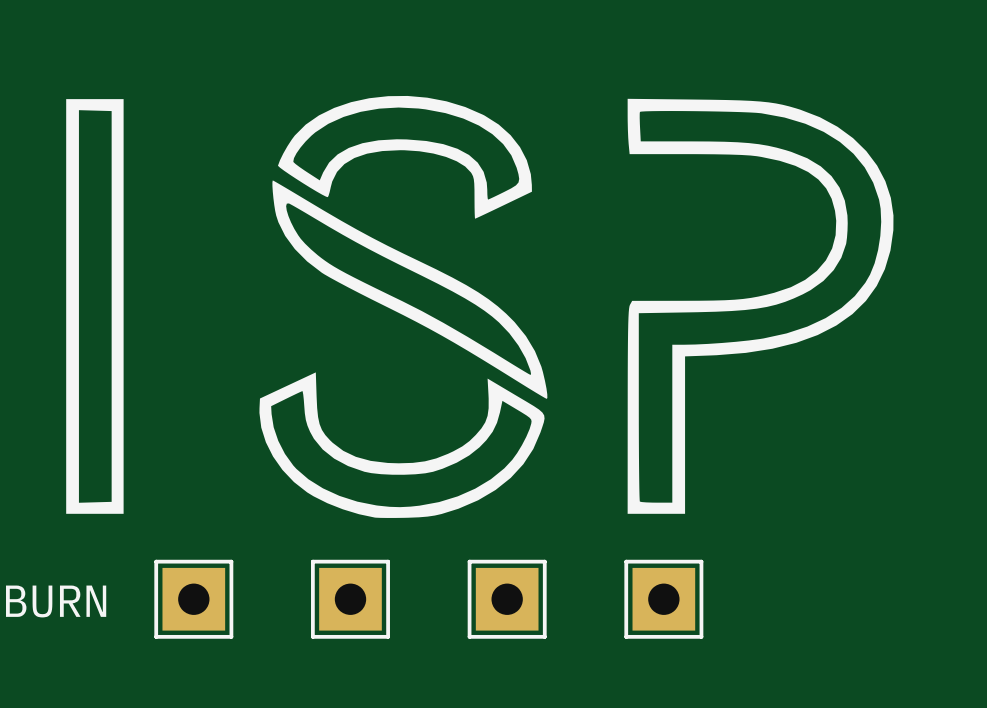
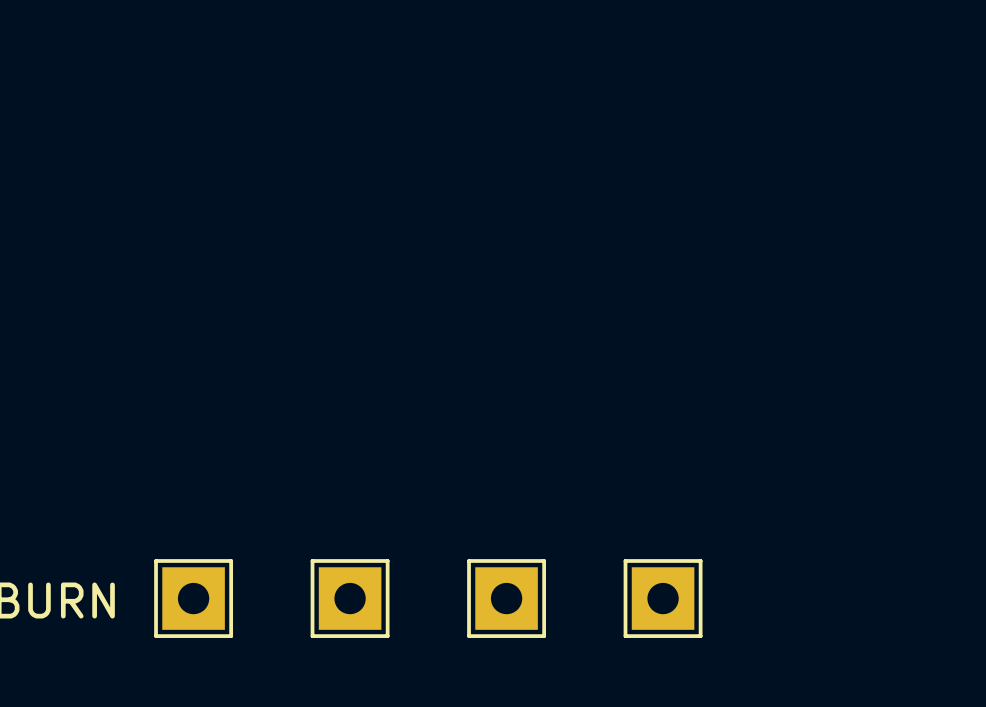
drawing: [66, 95, 894, 518] -> none

